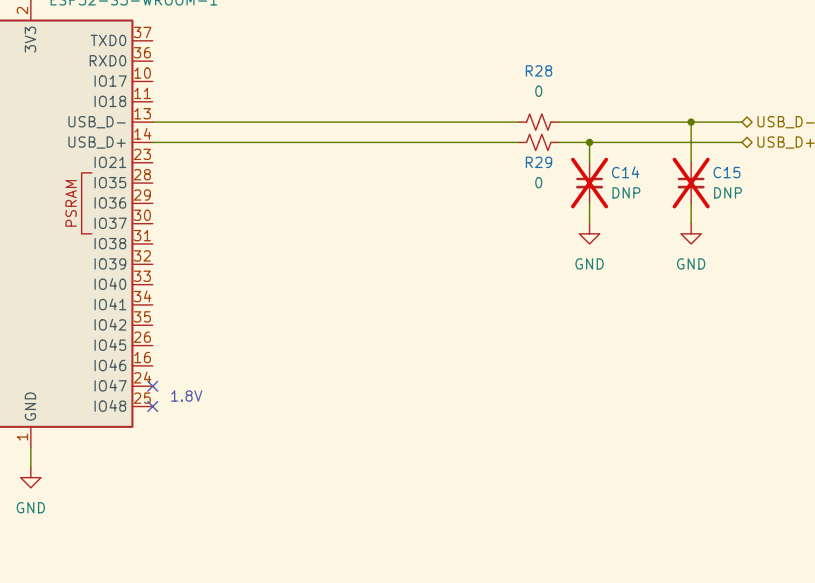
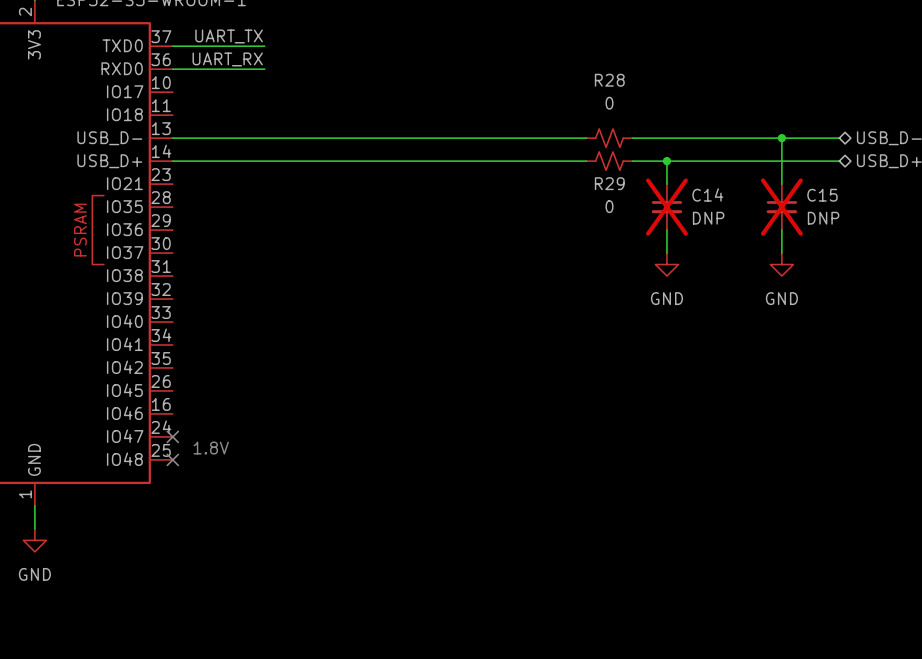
label: none -> UART_TX (229, 36)
wire: none -> (172, 46) (264, 46)
label: none -> UART_RX (227, 59)
wire: none -> (172, 69) (264, 69)

